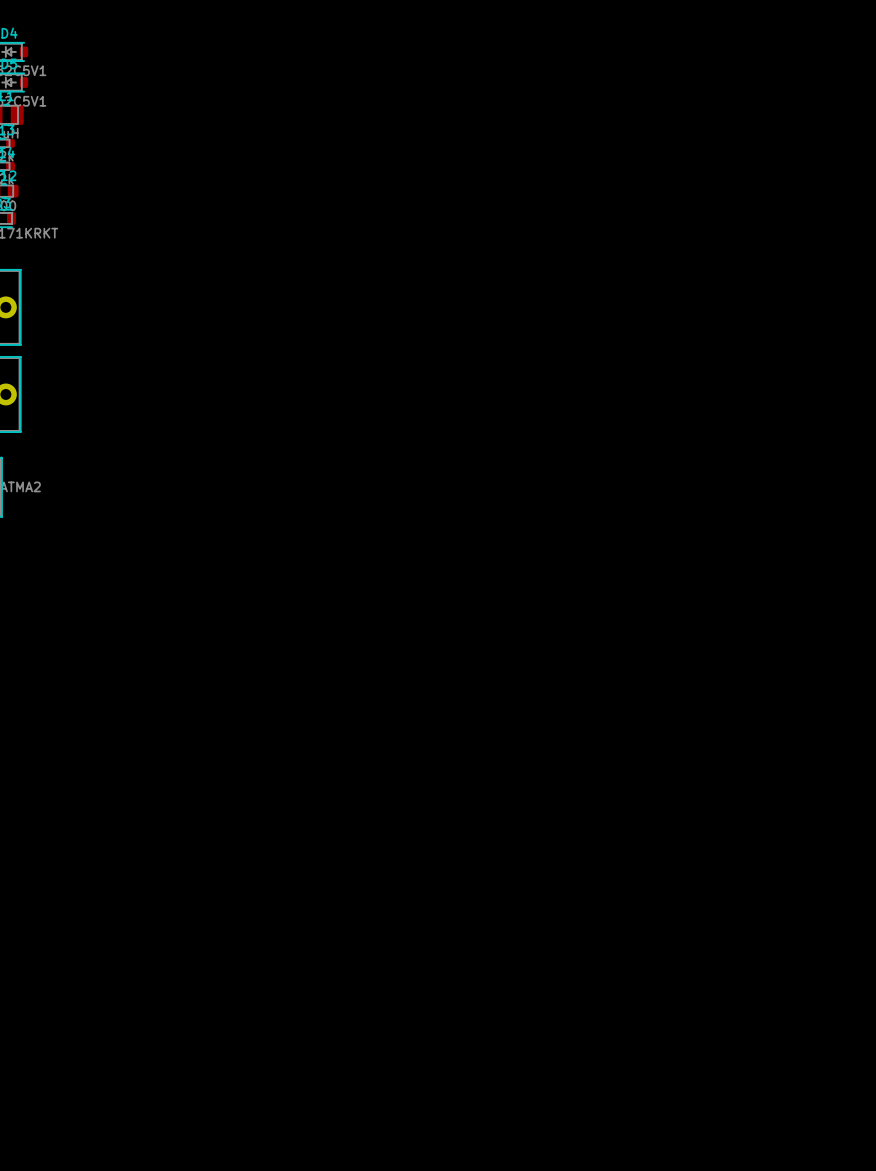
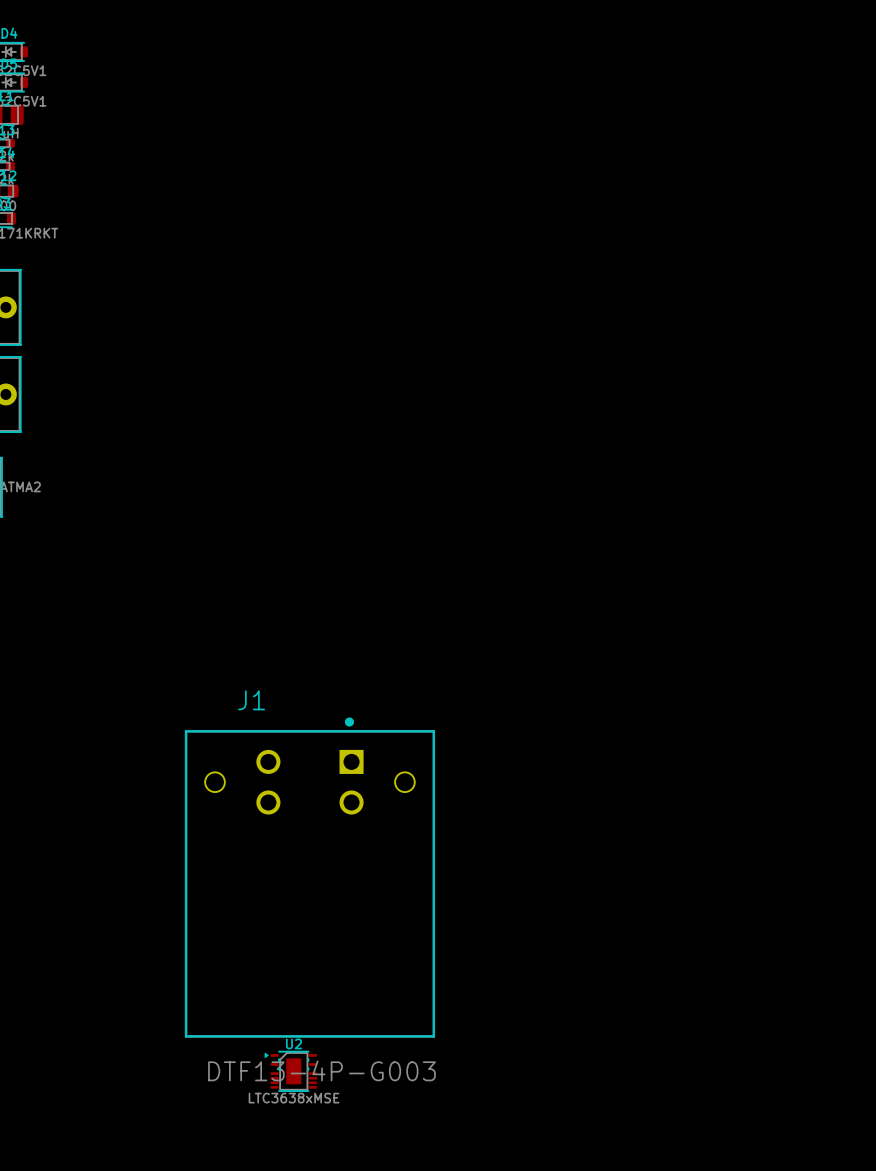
J1: none -> DTF13-4P-G003 (309, 877)
U2: none -> LTC3638xMSE (290, 1071)

